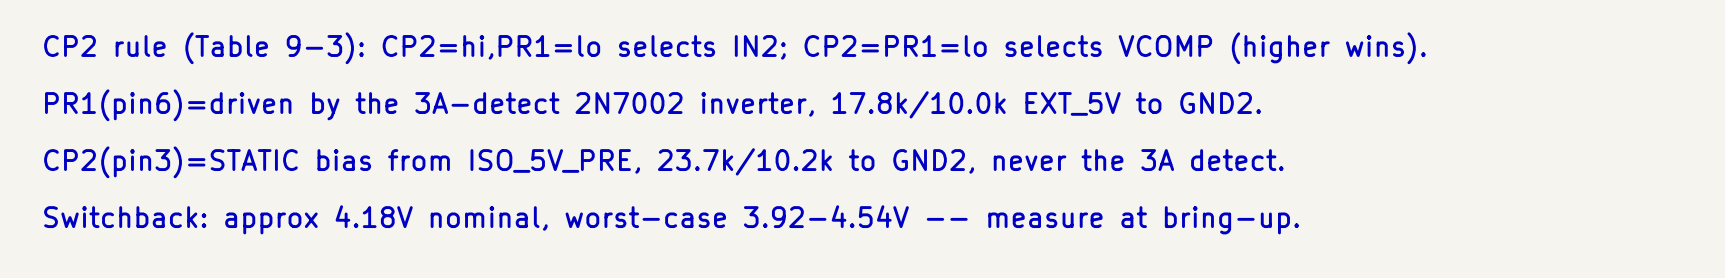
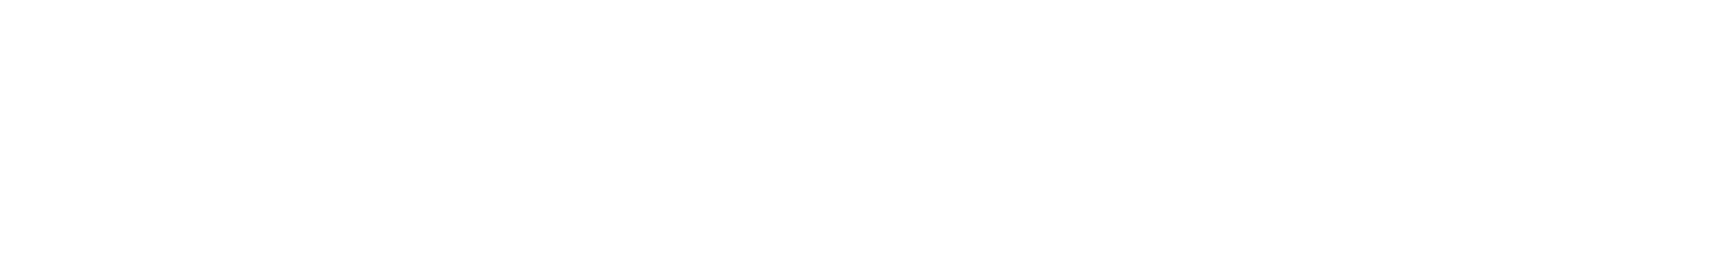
text: CP2 rule (Table 9-3): CP2=hi,PR1=lo selects IN2; CP2=PR1=lo selects VCOMP (higher wins). (734, 48) -> none
text: PR1(pin6)=driven by the 3A-detect 2N7002 inverter, 17.8k/10.0k EXT_5V to GND2. (653, 105) -> none
text: CP2(pin3)=STATIC bias from ISO_5V_PRE, 23.7k/10.2k to GND2, never the 3A detect. (663, 162) -> none
text: Switchback: approx 4.18V nominal, worst-case 3.92-4.54V -- measure at bring-up. (671, 219) -> none

